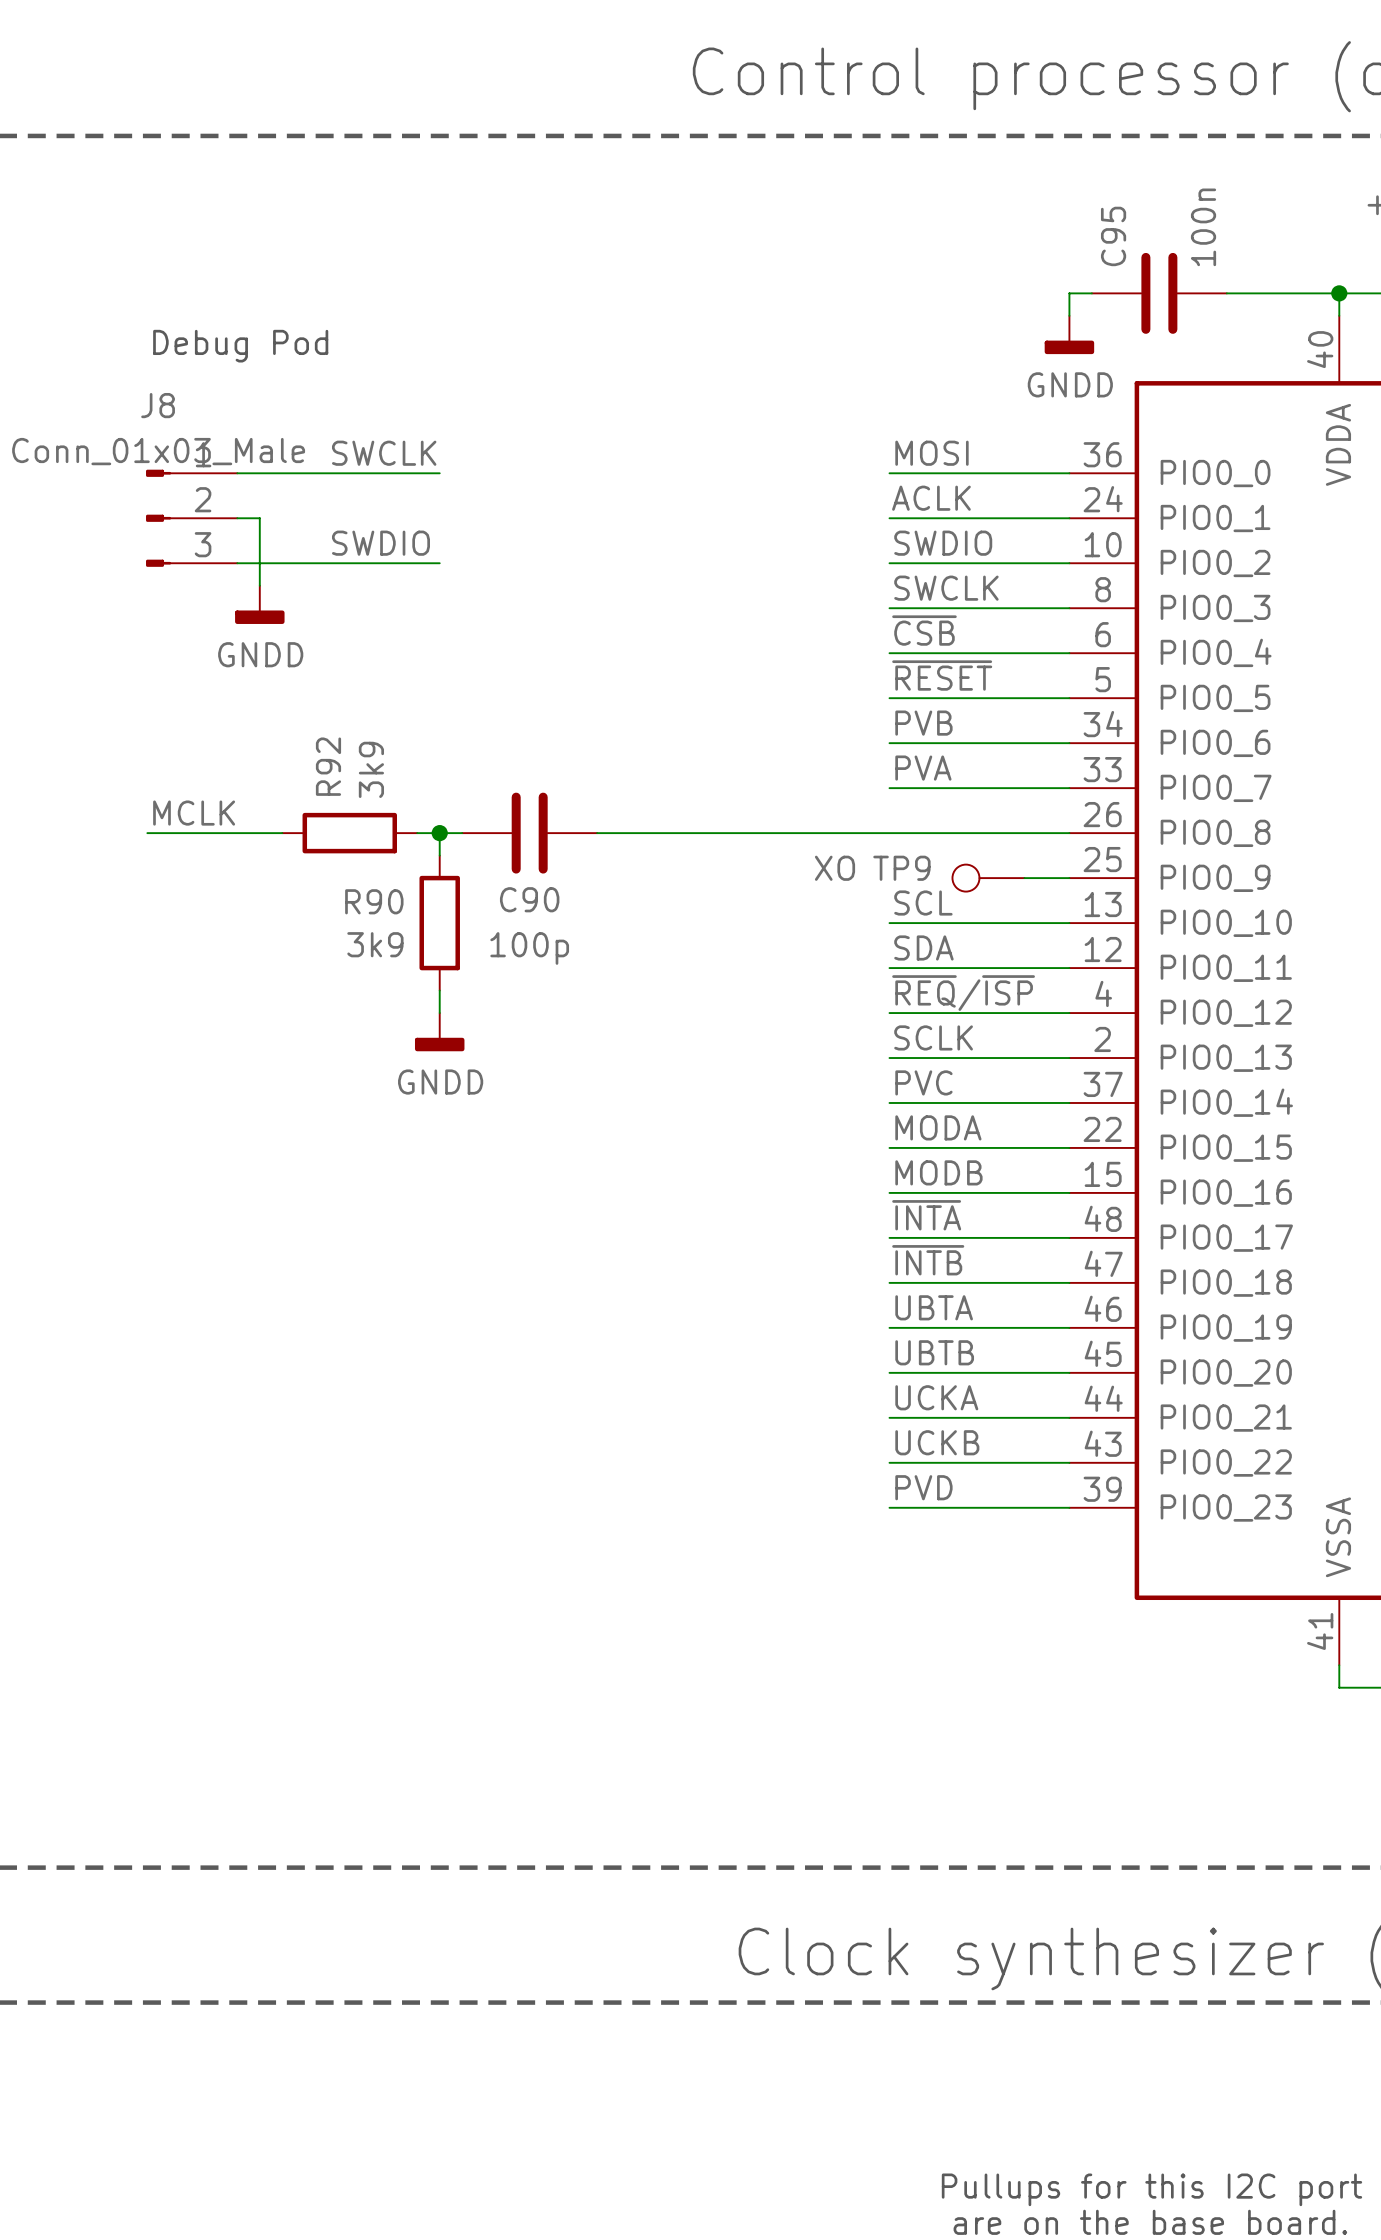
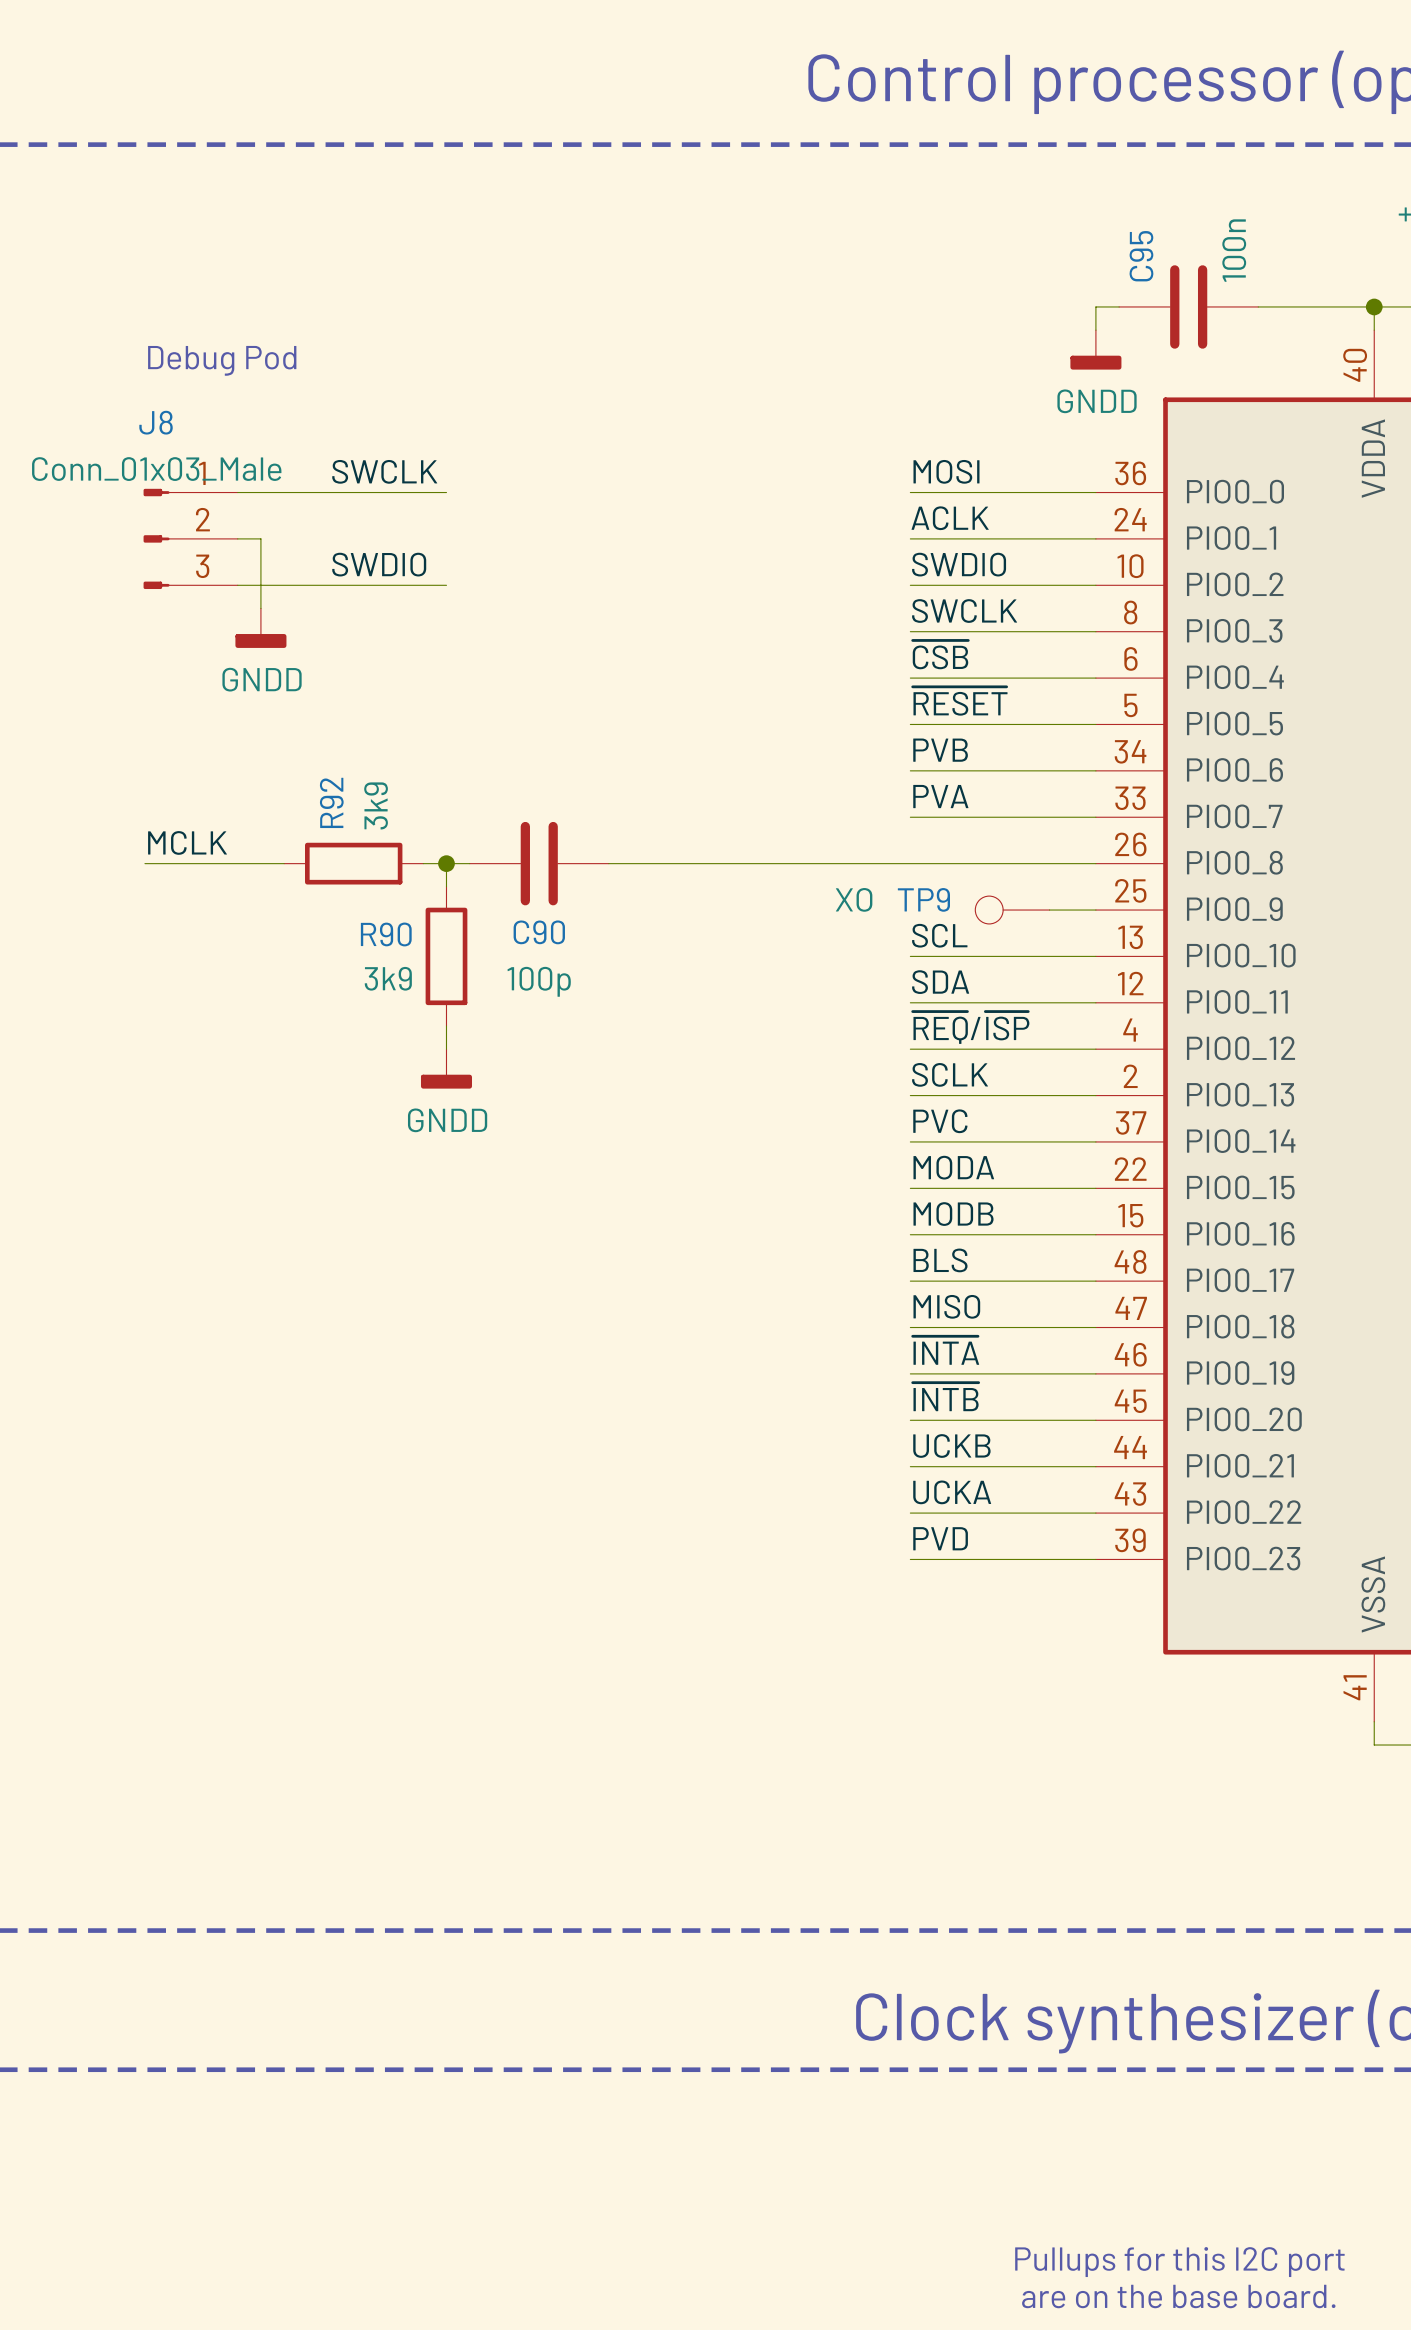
label: ~{INTA} (926, 1215) -> BLS (940, 1260)
label: ~{INTB} (928, 1260) -> MISO (946, 1306)
label: UBTA (934, 1307) -> ~{INTA} (945, 1350)
label: UBTB (934, 1352) -> ~{INTB} (945, 1396)
label: UCKA (936, 1397) -> UCKB (951, 1446)
label: UCKB (937, 1442) -> UCKA (952, 1492)

